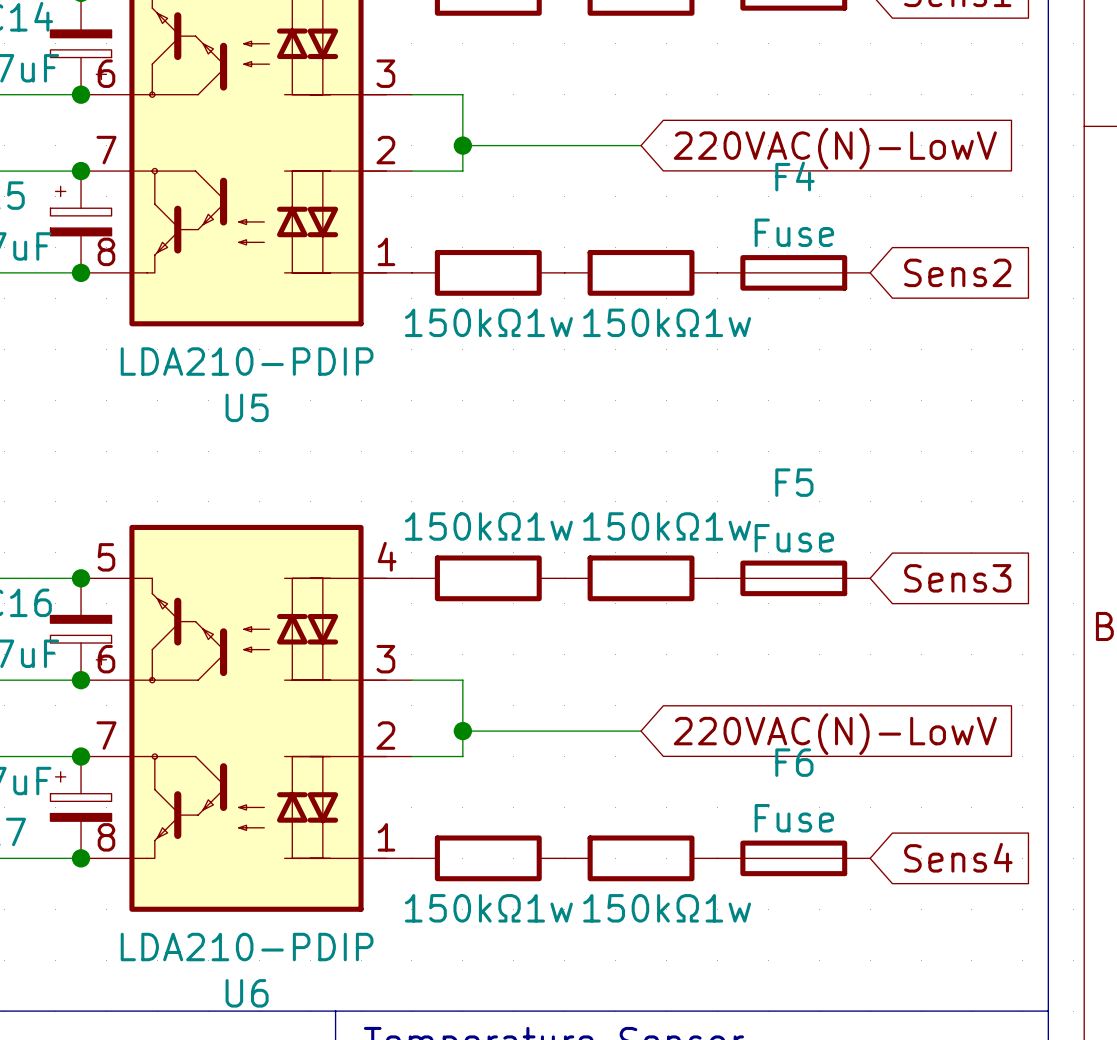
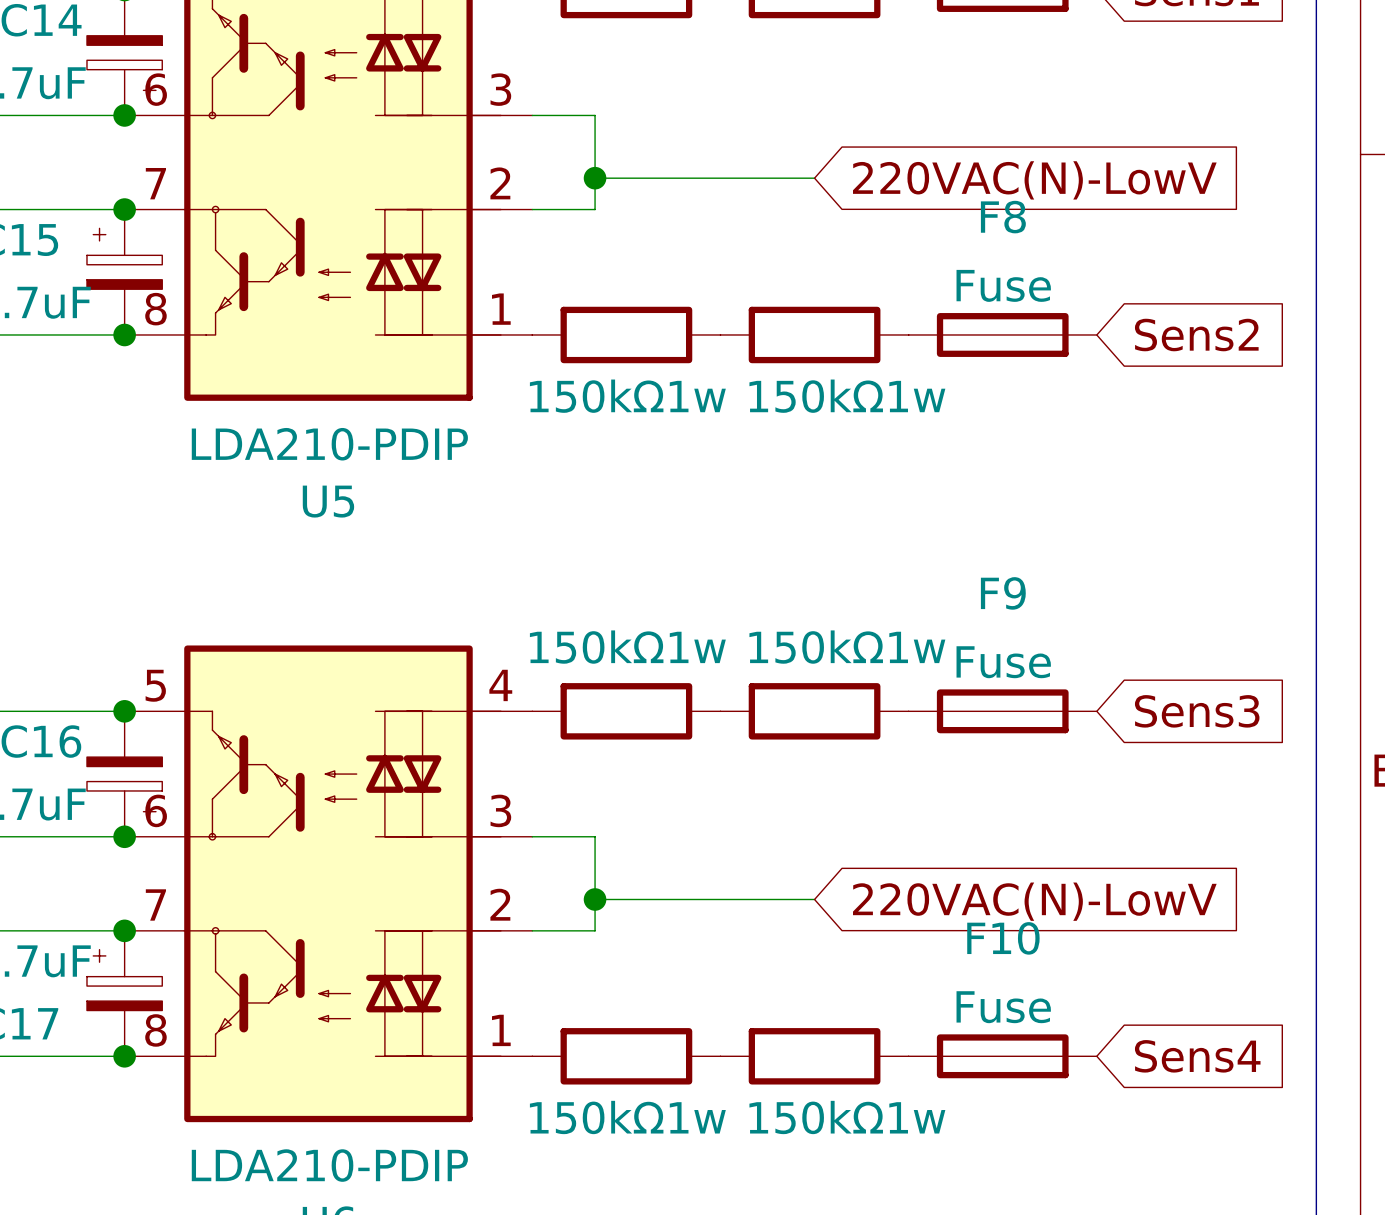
F4 name: F4 (794, 176) -> F8 (1003, 217)
F5 name: F5 (794, 482) -> F9 (1003, 593)
F6 name: F6 (794, 762) -> F10 (1003, 938)

